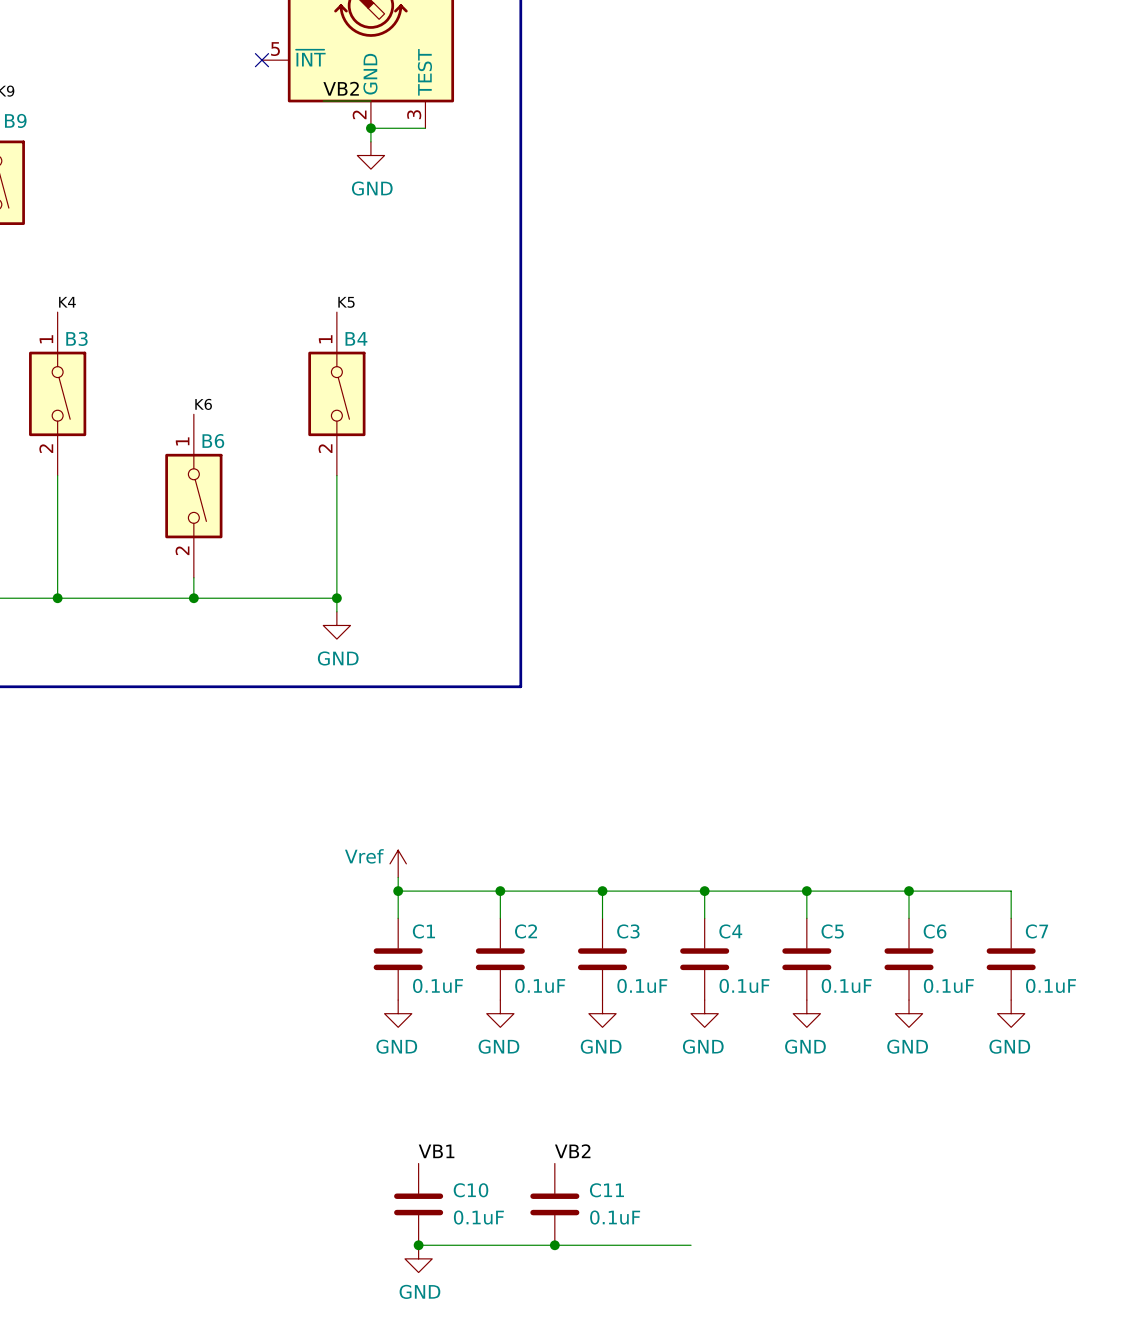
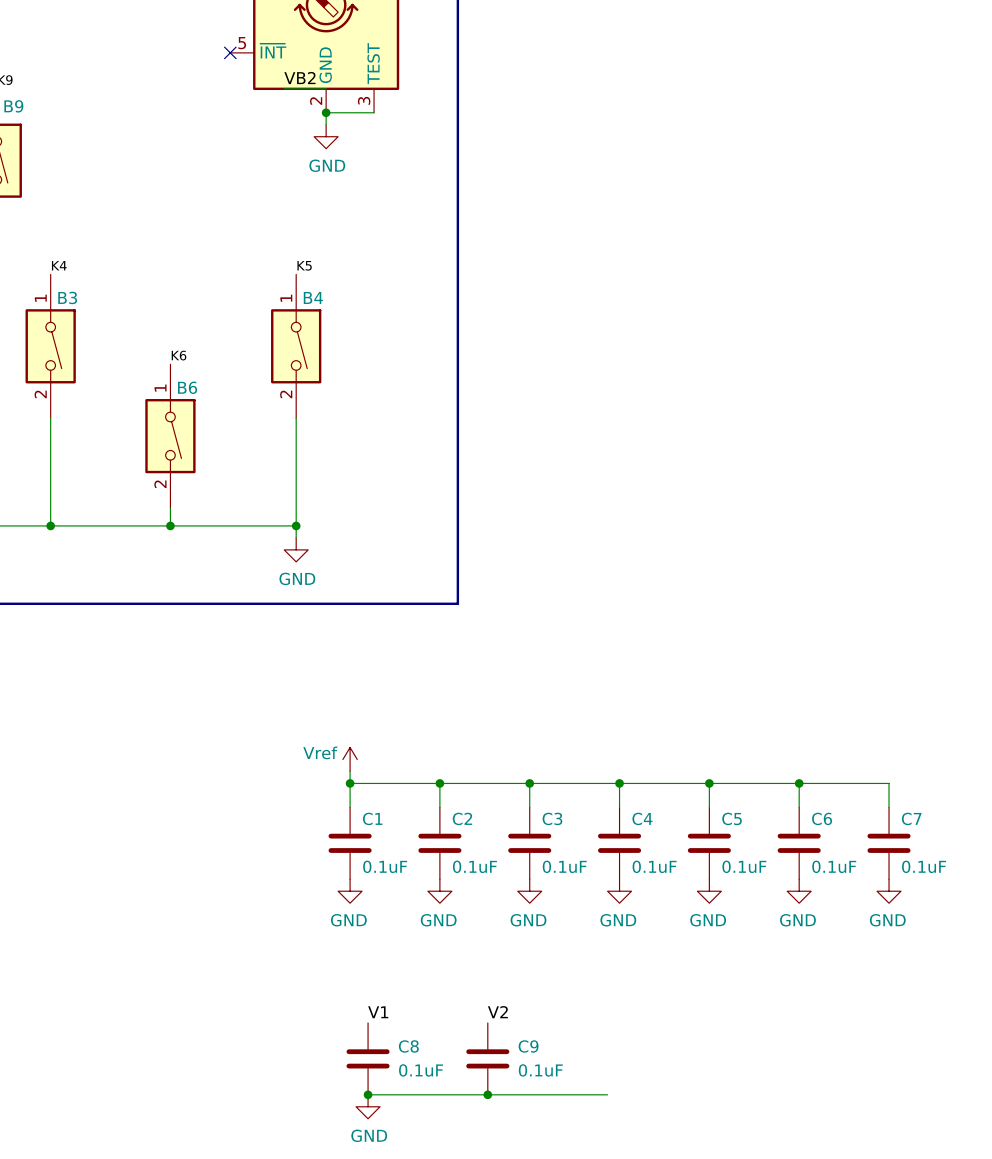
label: VB1 (436, 1151) -> V1 (378, 1012)
label: VB2 (572, 1151) -> V2 (497, 1012)
C10 name: C10 (470, 1190) -> C8 (408, 1046)
C11 name: C11 (606, 1190) -> C9 (528, 1046)

